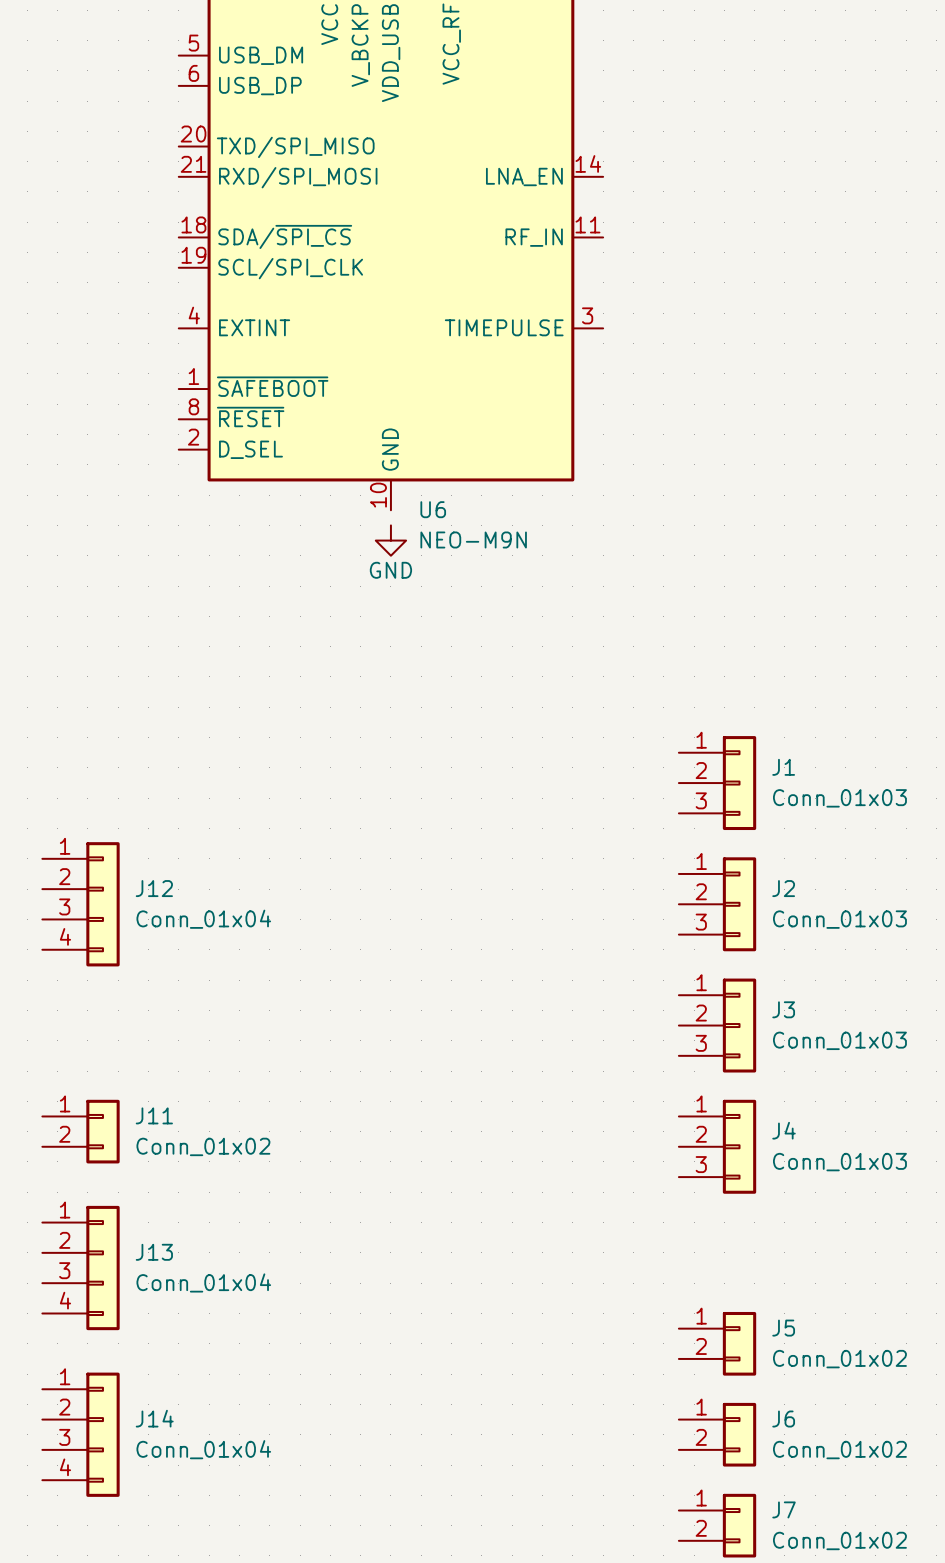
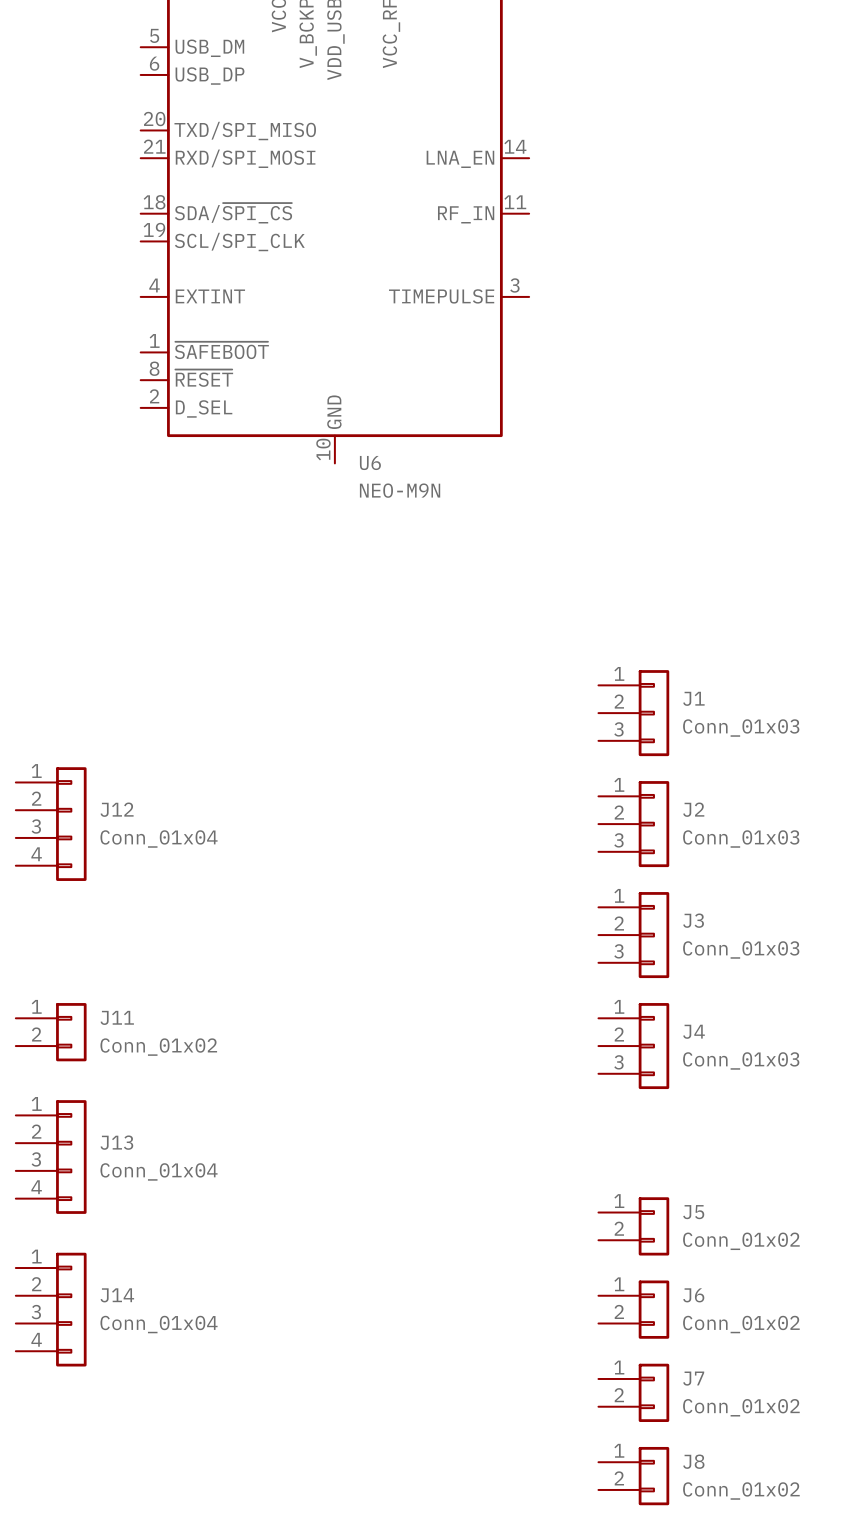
power symbol: GND (390, 540) -> none

